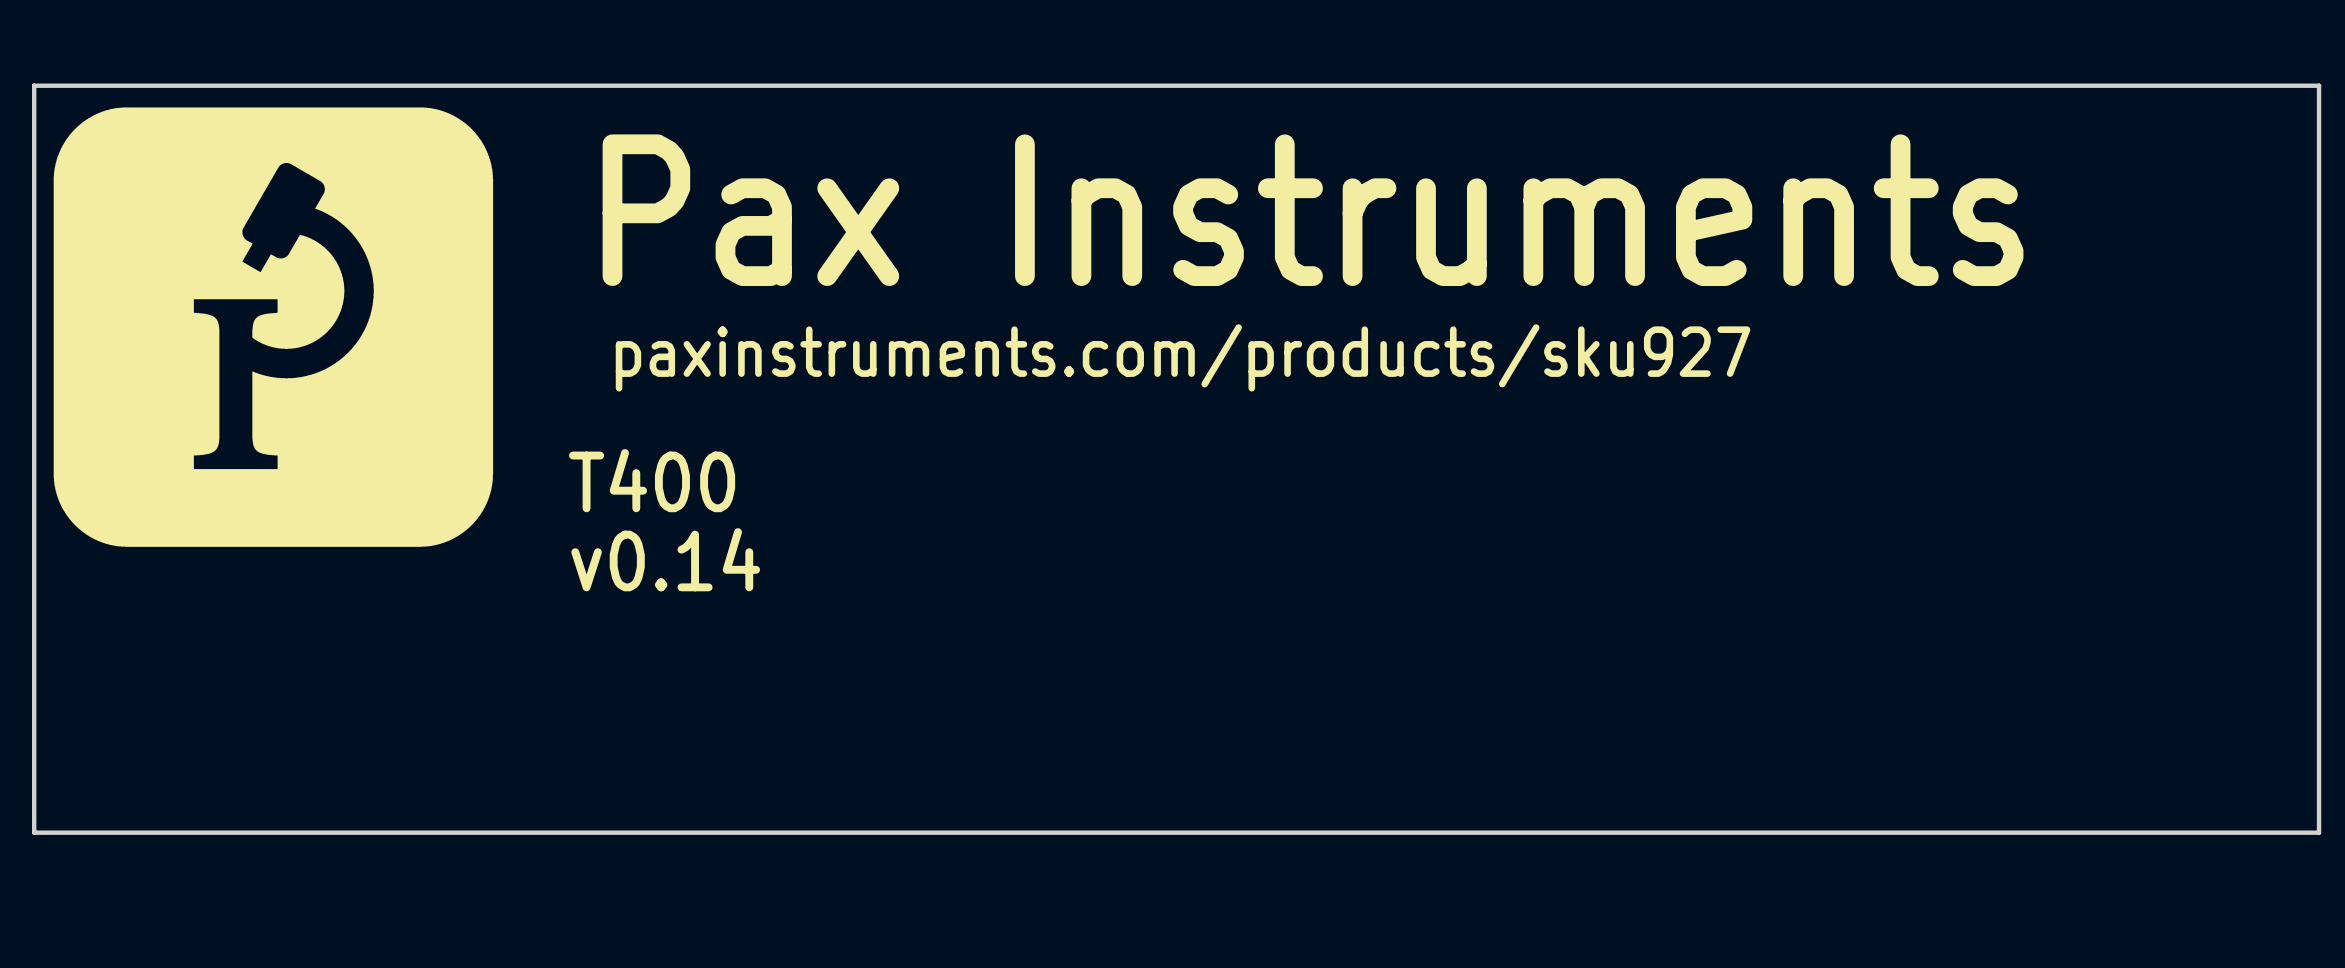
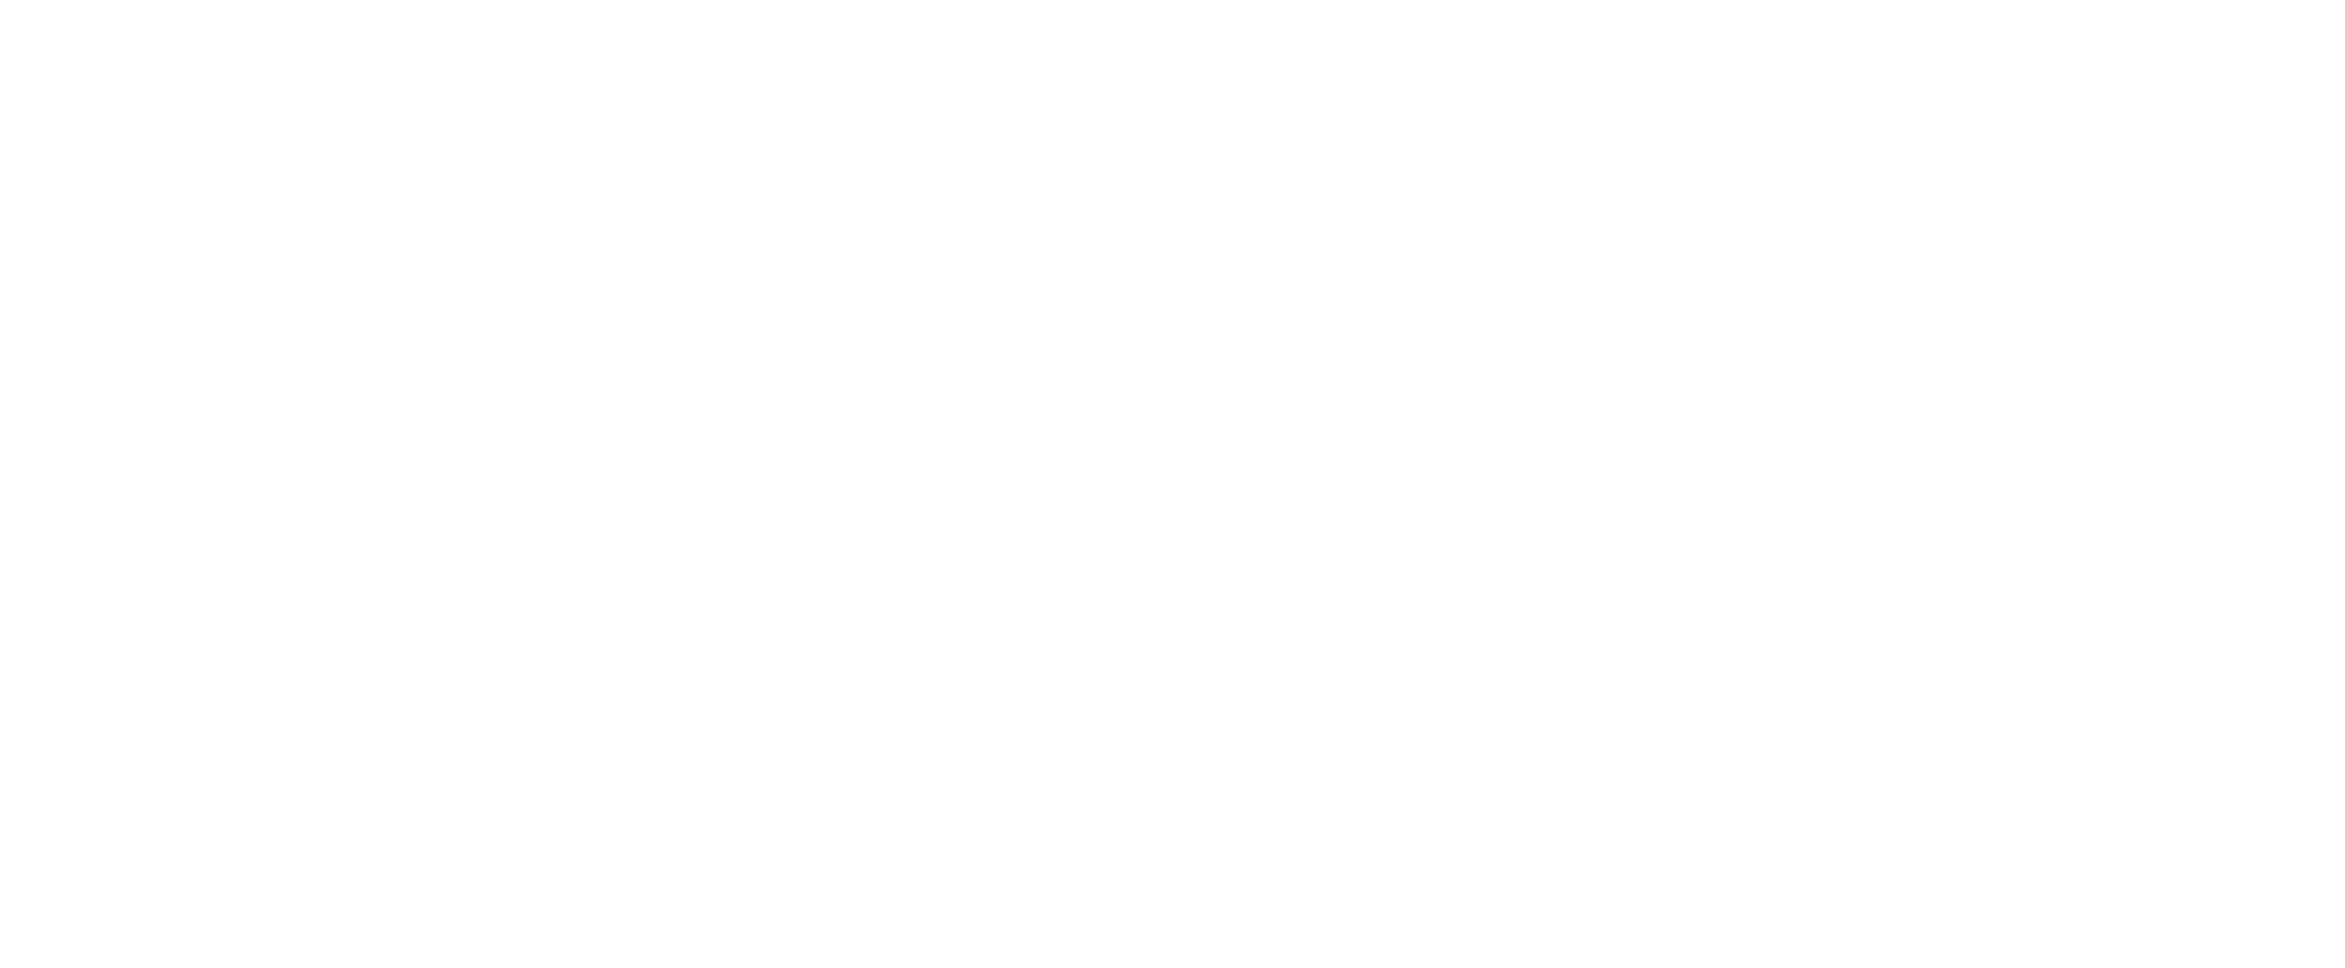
board edge: (34, 85) (34, 832) (2319, 832) (2319, 85) (34, 85) -> none
drawing: [53, 107, 494, 547] -> none
text: Pax Instruments (1313, 210) -> none
text: paxinstruments.com/products/sku927 (1183, 357) -> none
text: T400 (652, 480) -> none
text: v0.14 (665, 559) -> none

